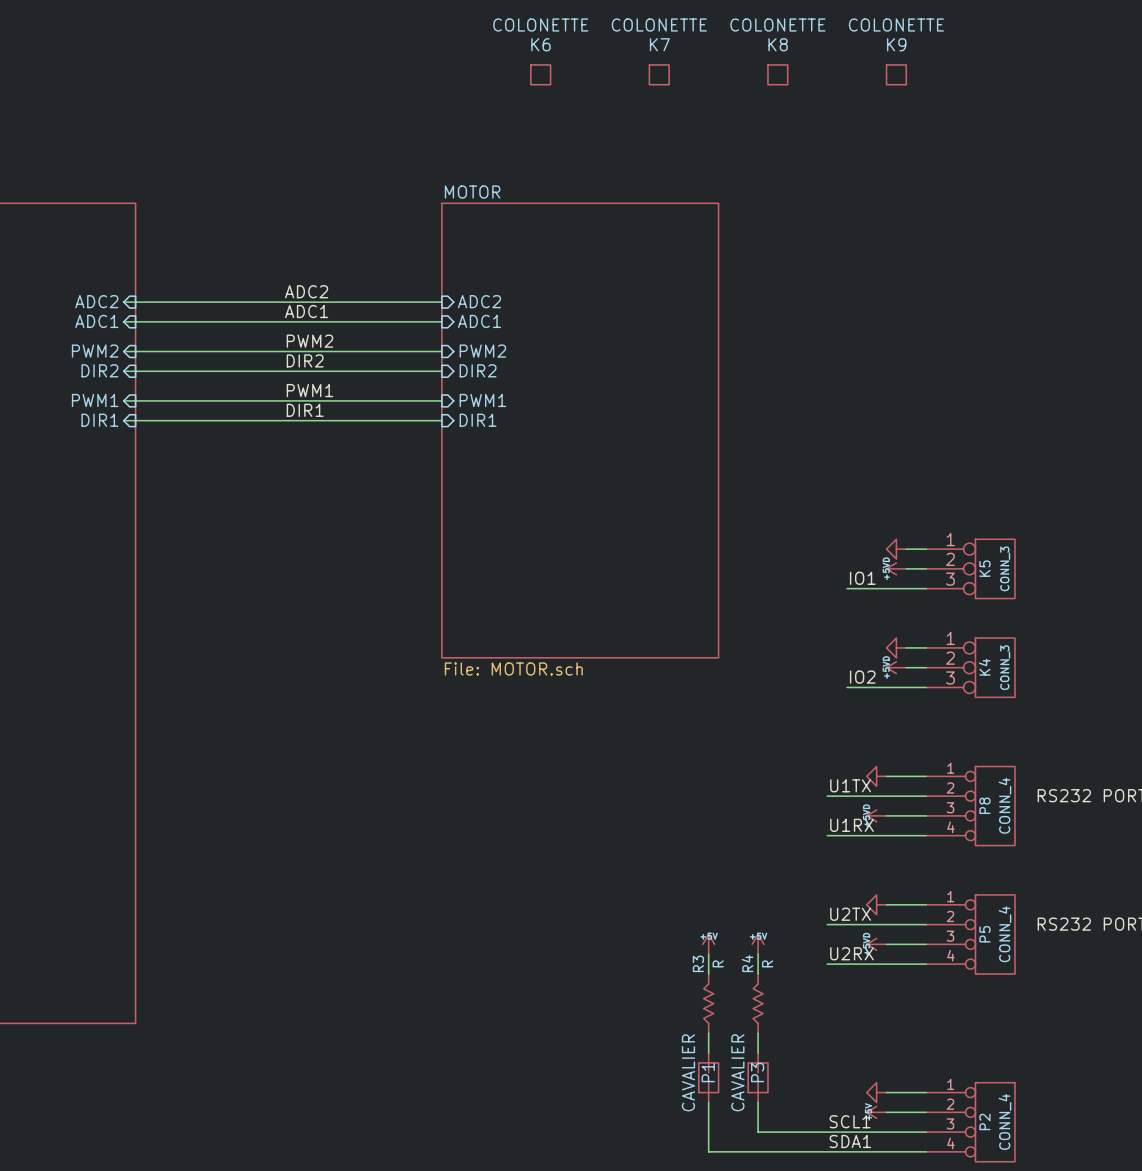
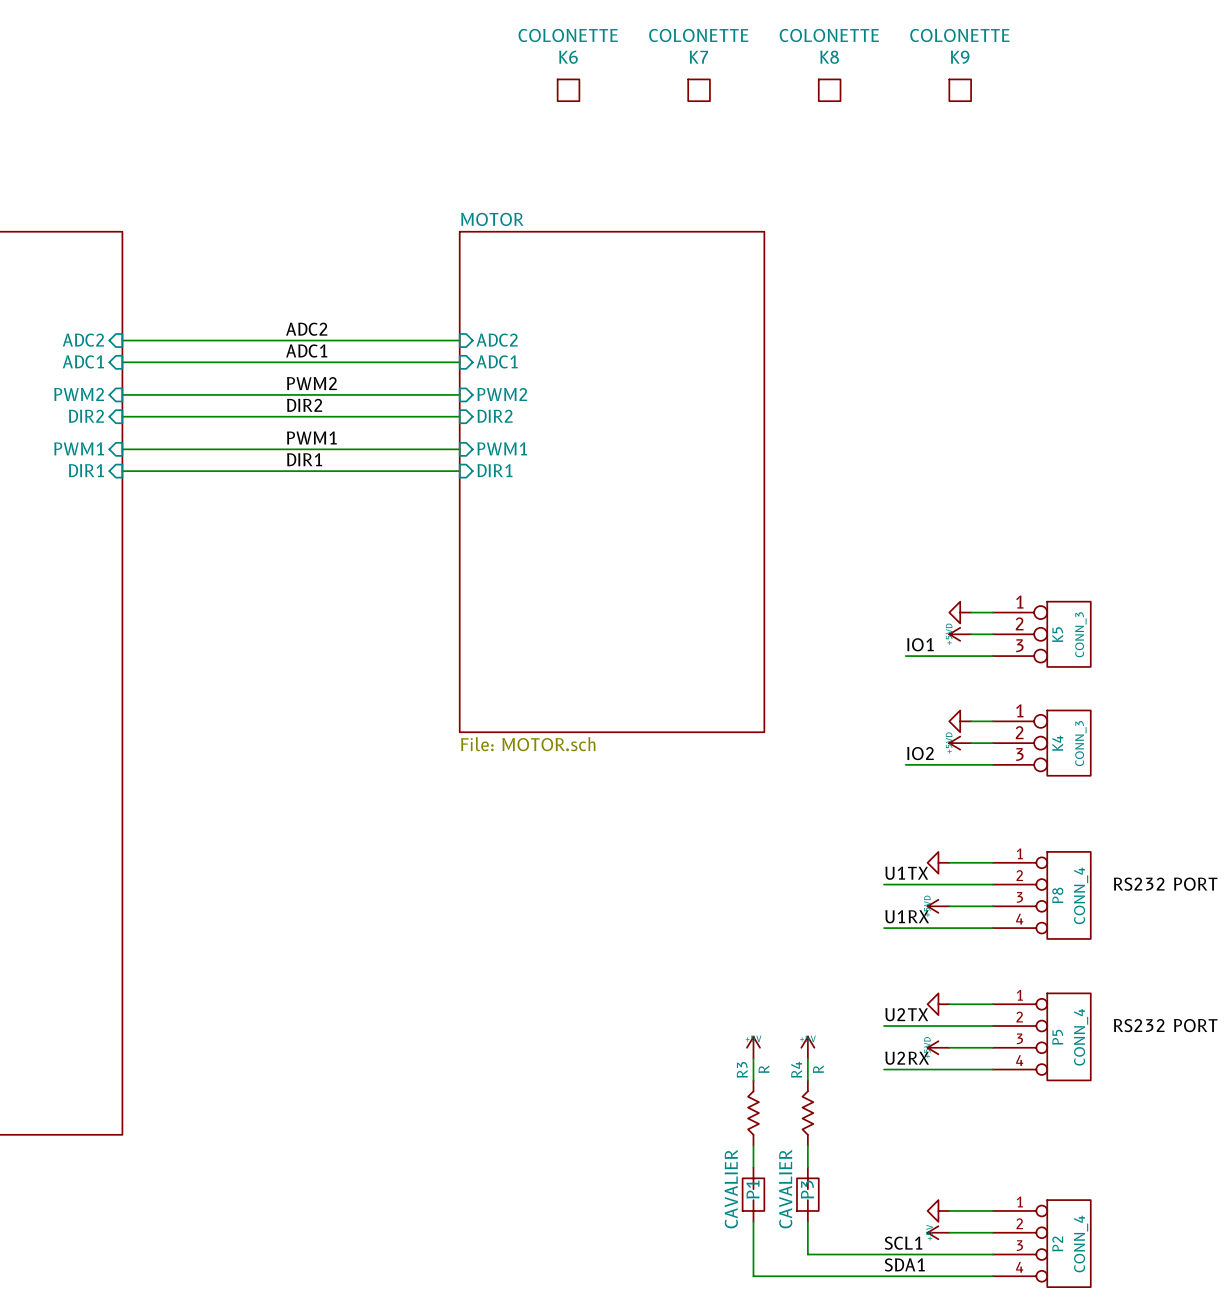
wire: (125, 302) (135, 302) -> none
wire: (125, 321) (135, 321) -> none
wire: (125, 351) (135, 351) -> none
wire: (125, 371) (135, 371) -> none
wire: (125, 400) (135, 400) -> none
wire: (125, 420) (135, 420) -> none

